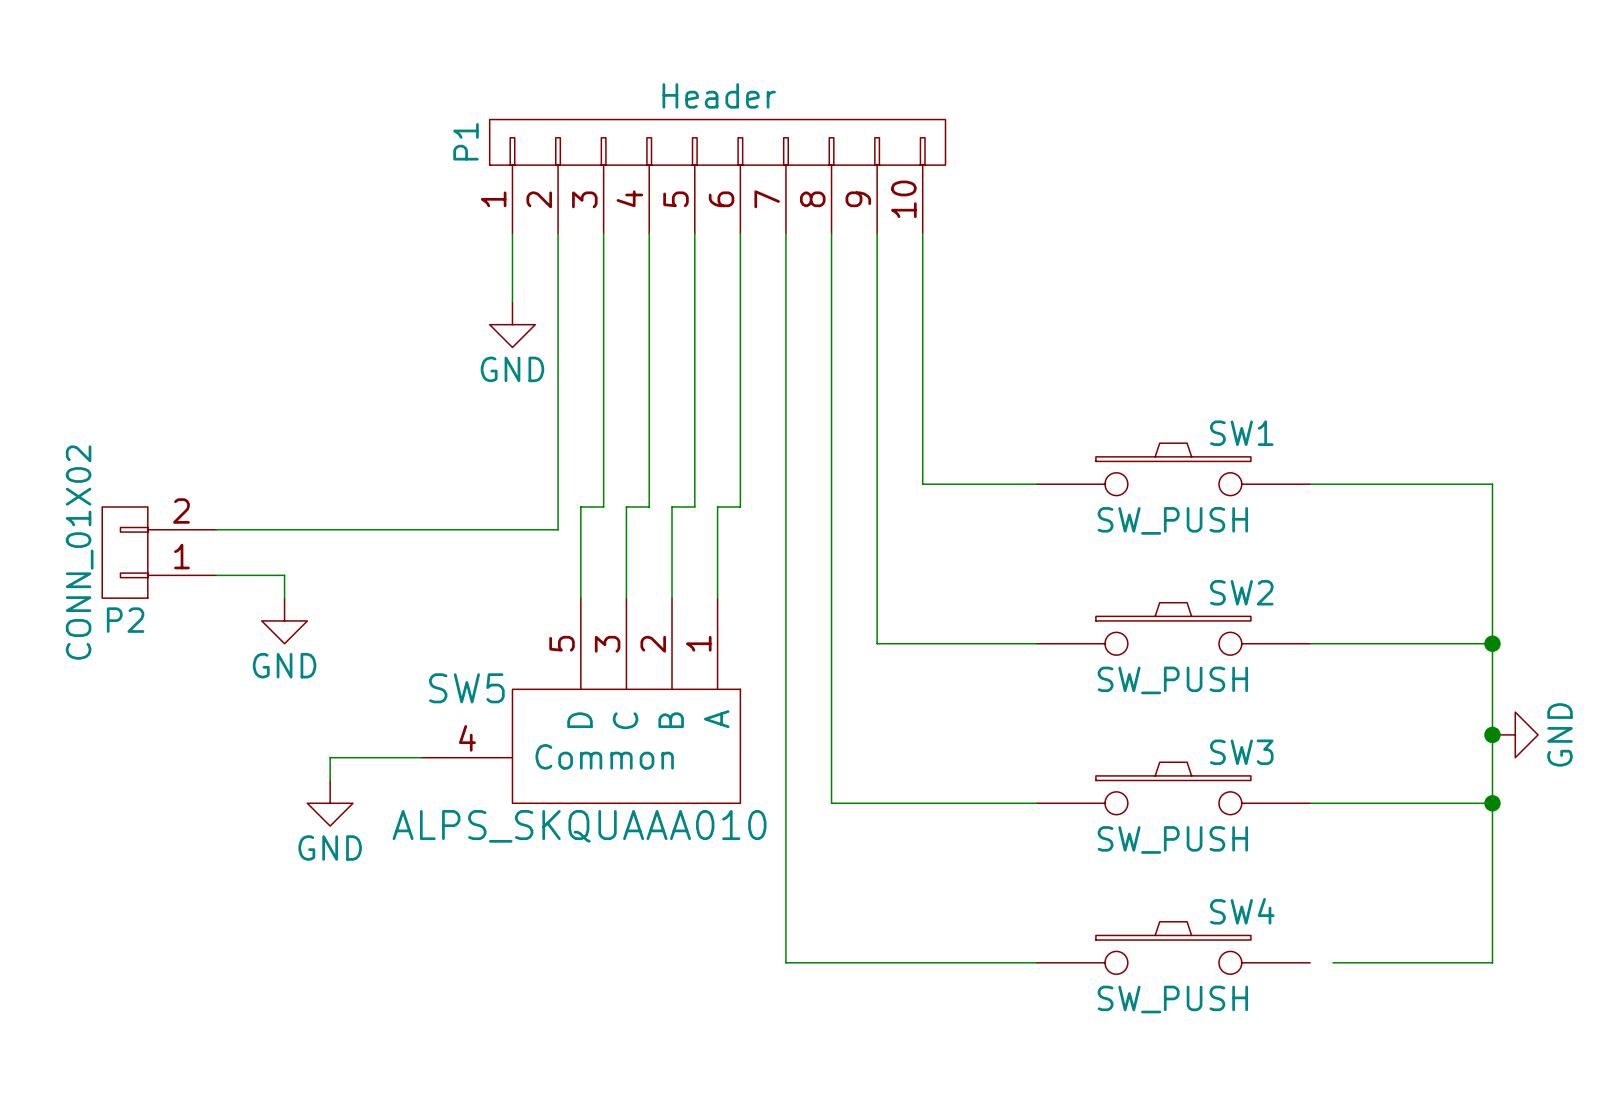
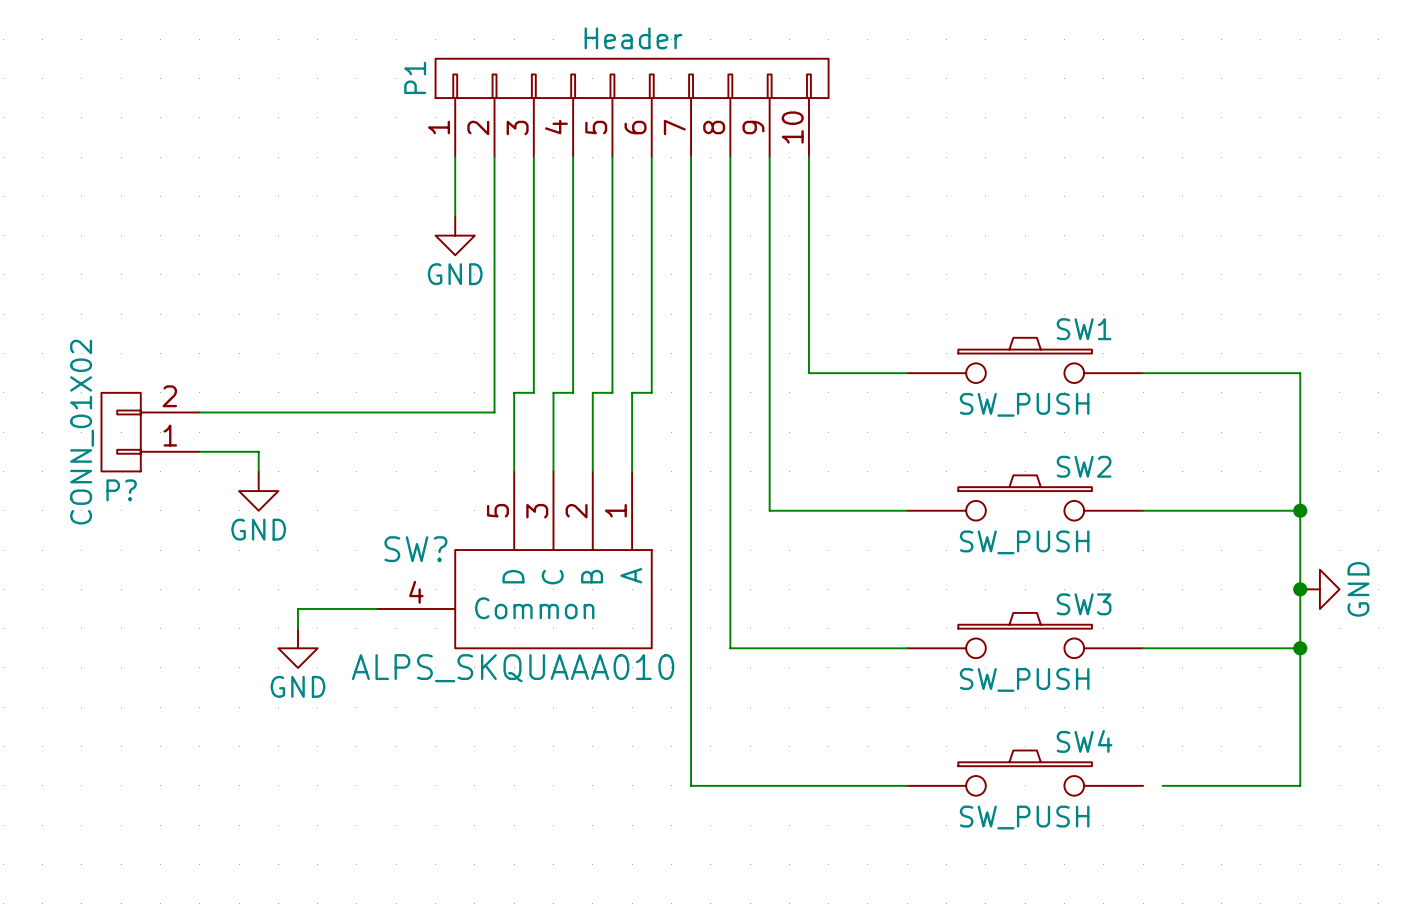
P2 name: P2 (125, 620) -> P? (121, 490)
SW5 name: SW5 (466, 688) -> SW? (415, 549)

